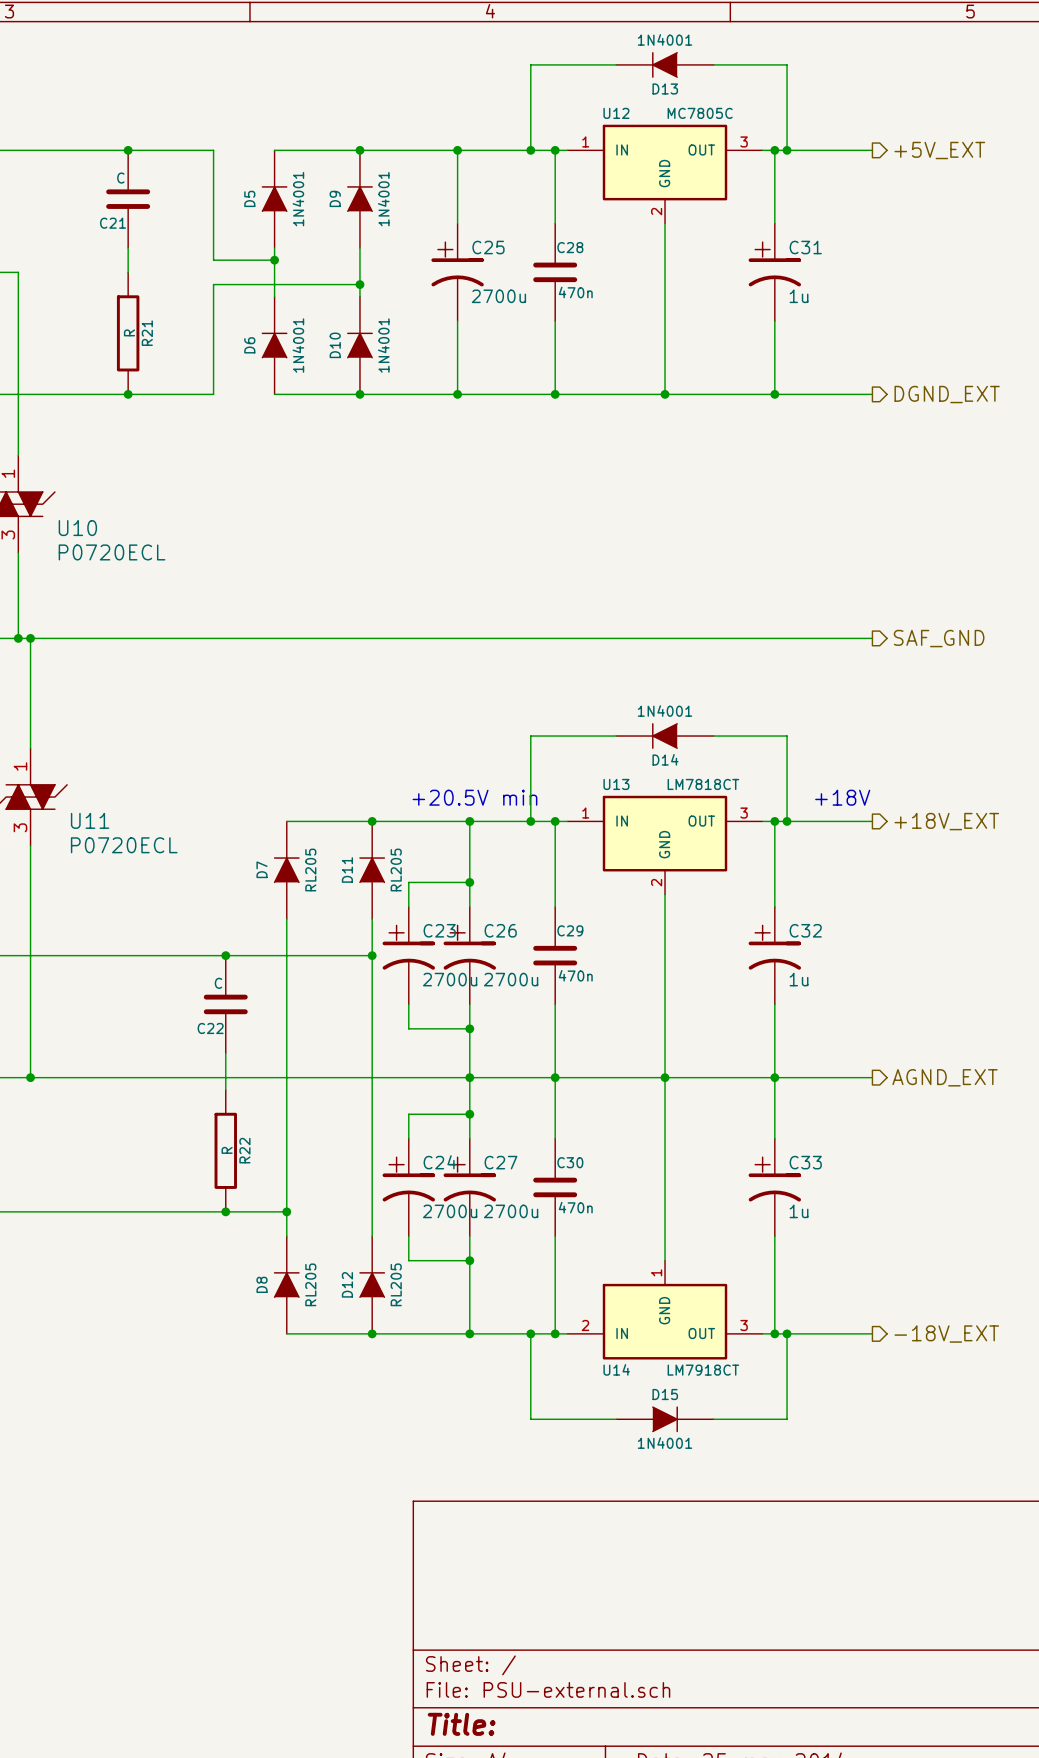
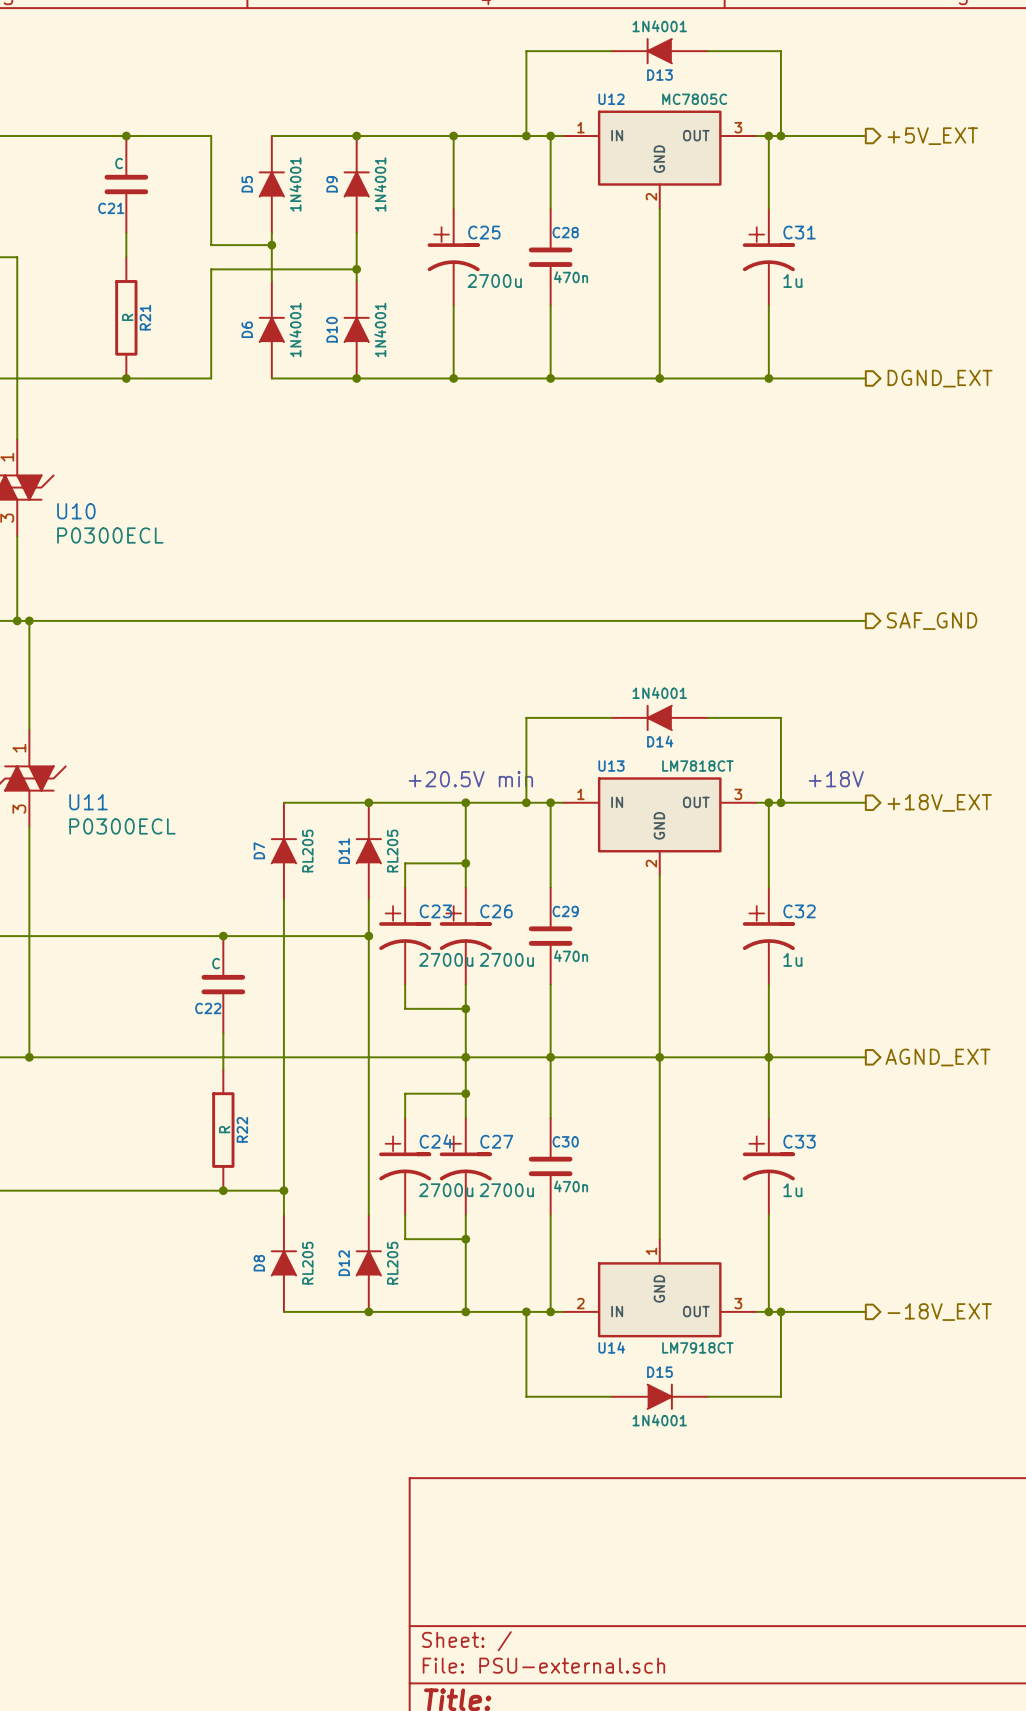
U10 value: P0720ECL (112, 552) -> P0300ECL (110, 535)
U11 value: P0720ECL (124, 845) -> P0300ECL (122, 826)

